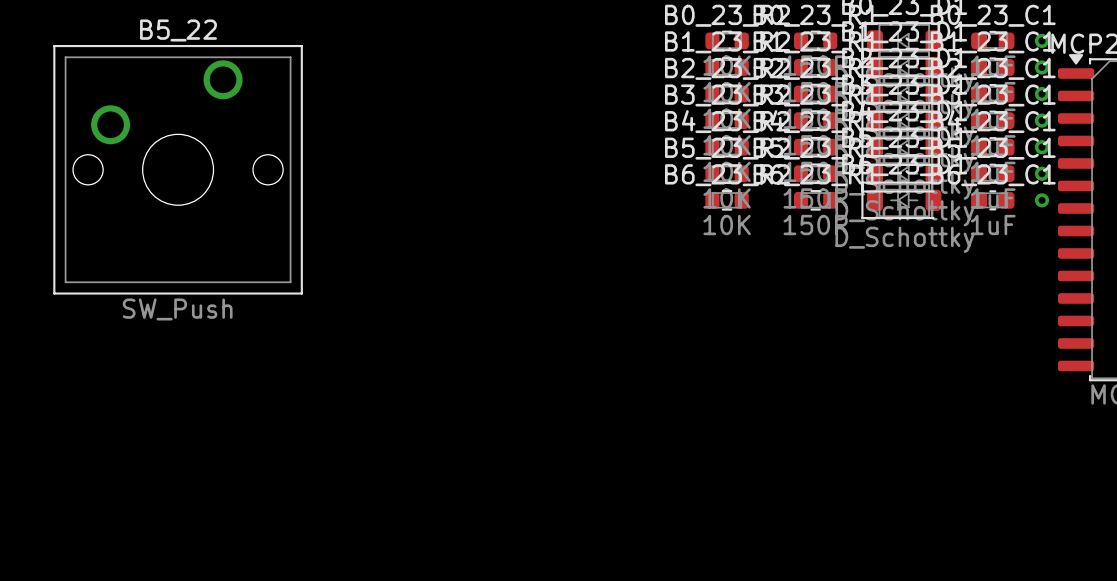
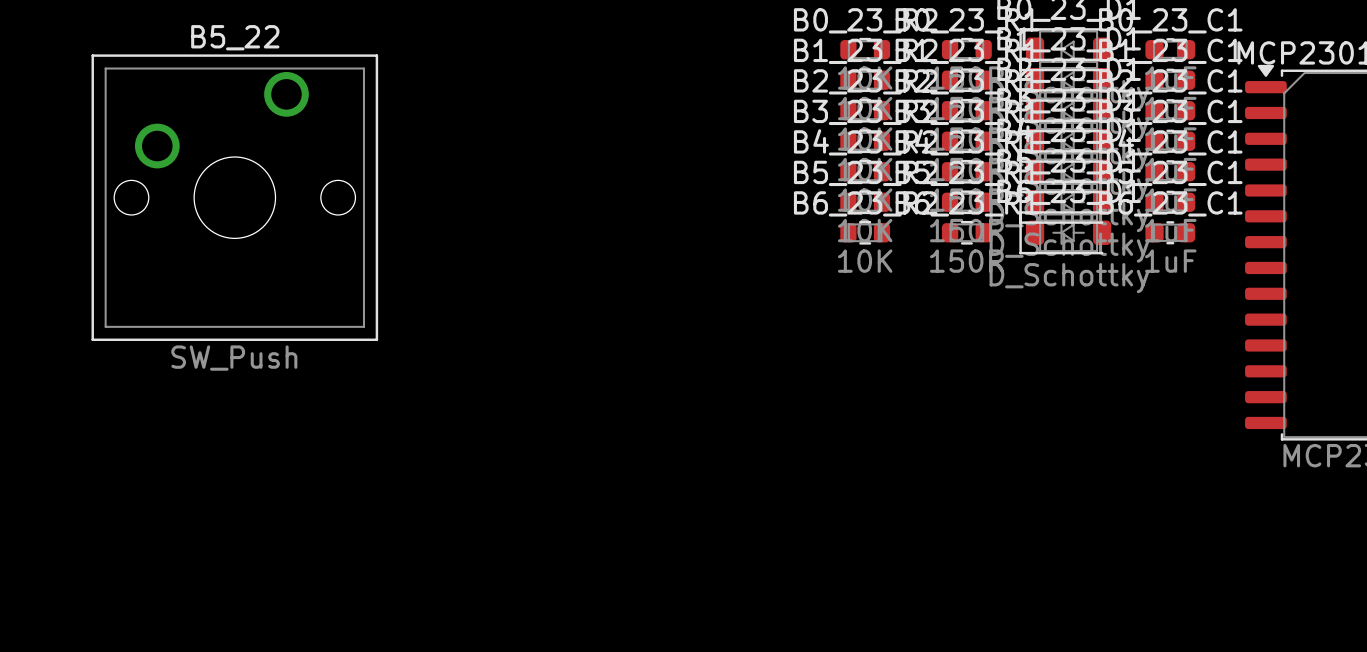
via: (1041, 40) -> none
via: (1041, 67) -> none
via: (1041, 94) -> none
via: (1041, 120) -> none
via: (1041, 147) -> none
via: (1041, 173) -> none
via: (1041, 200) -> none

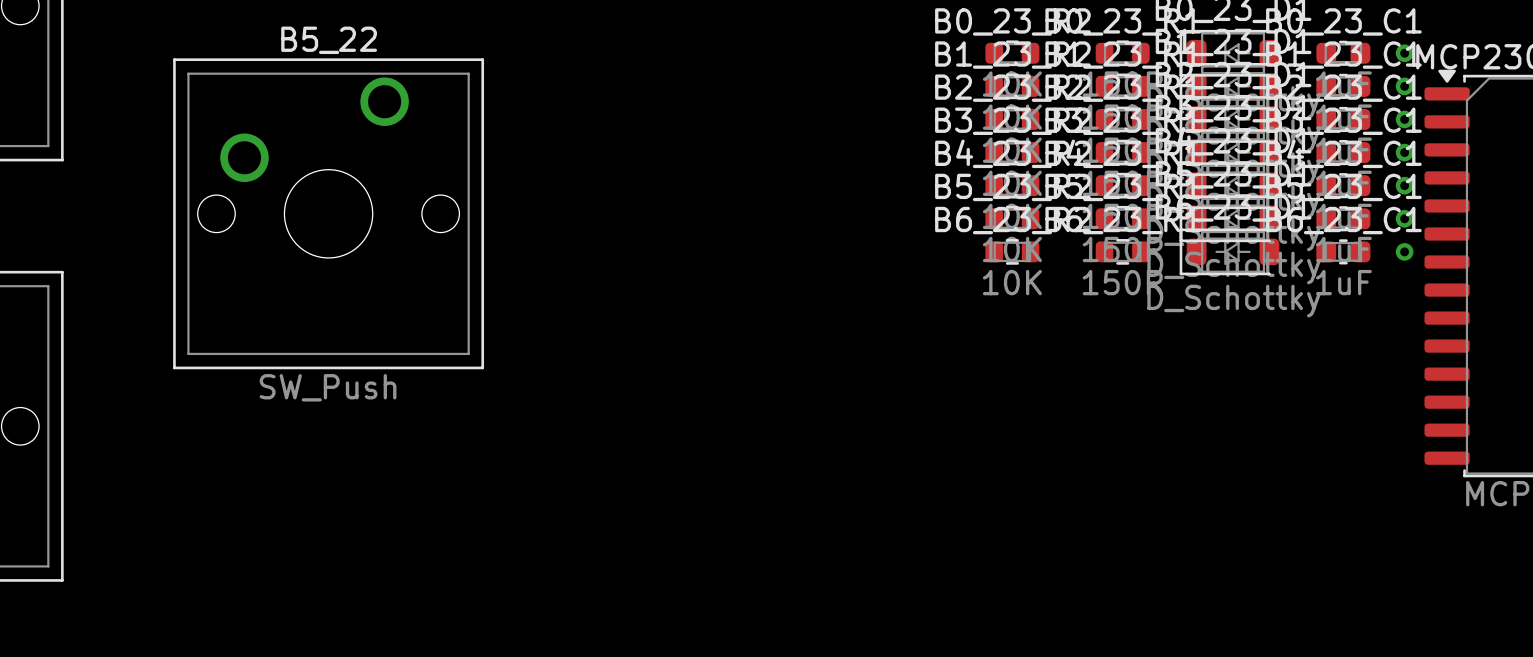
via: none -> (1404, 53)
via: none -> (1404, 86)
via: none -> (1404, 119)
via: none -> (1404, 152)
via: none -> (1404, 185)
via: none -> (1404, 218)
via: none -> (1404, 251)

